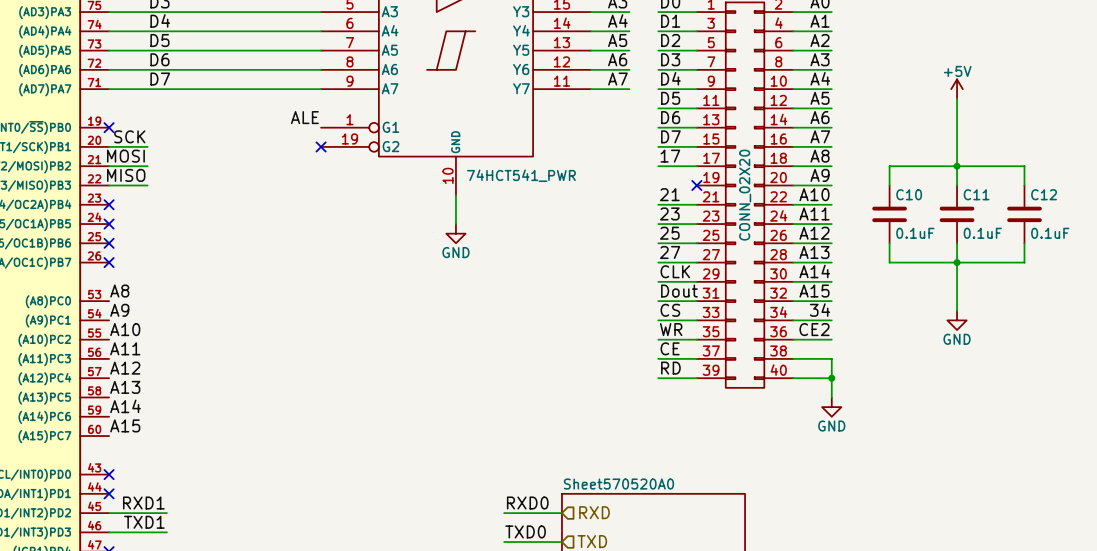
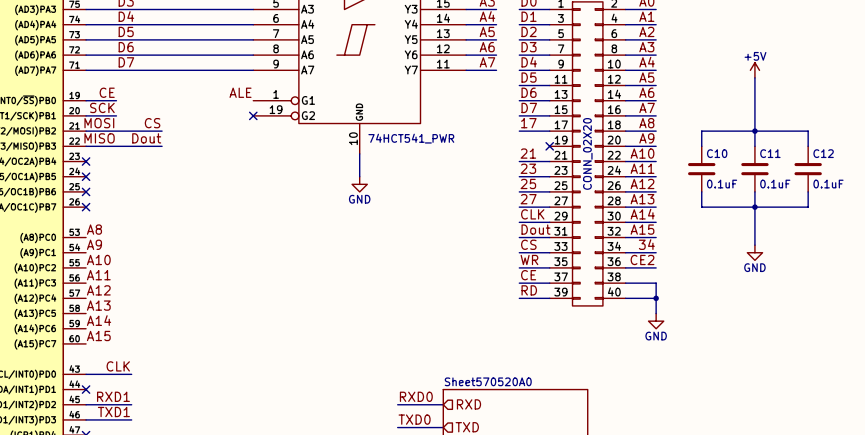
label: none -> CE (107, 92)
wire: none -> (86, 100) (116, 100)
no-connect mark: (109, 127) -> none
label: none -> CS (152, 123)
wire: none -> (116, 131) (162, 131)
label: none -> Dout (146, 138)
wire: none -> (116, 146) (162, 146)
label: none -> CLK (118, 366)
wire: none -> (86, 374) (131, 374)
no-connect mark: (109, 474) -> none

